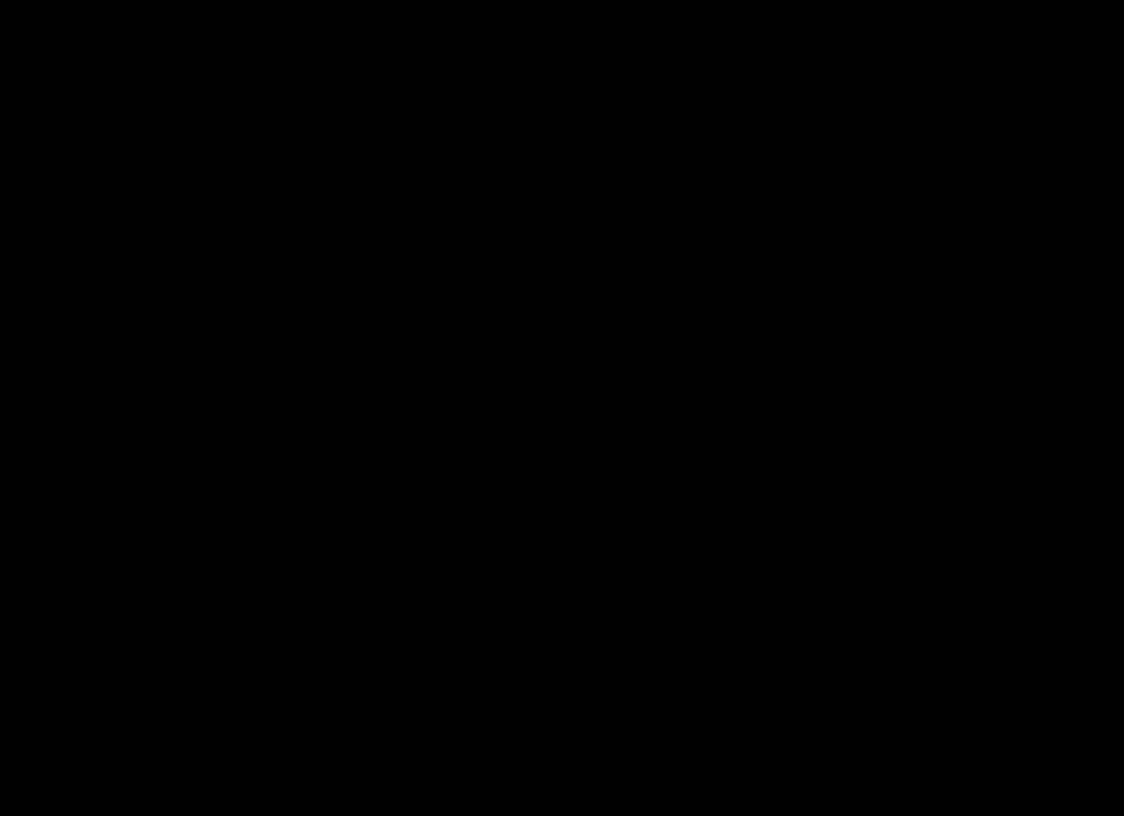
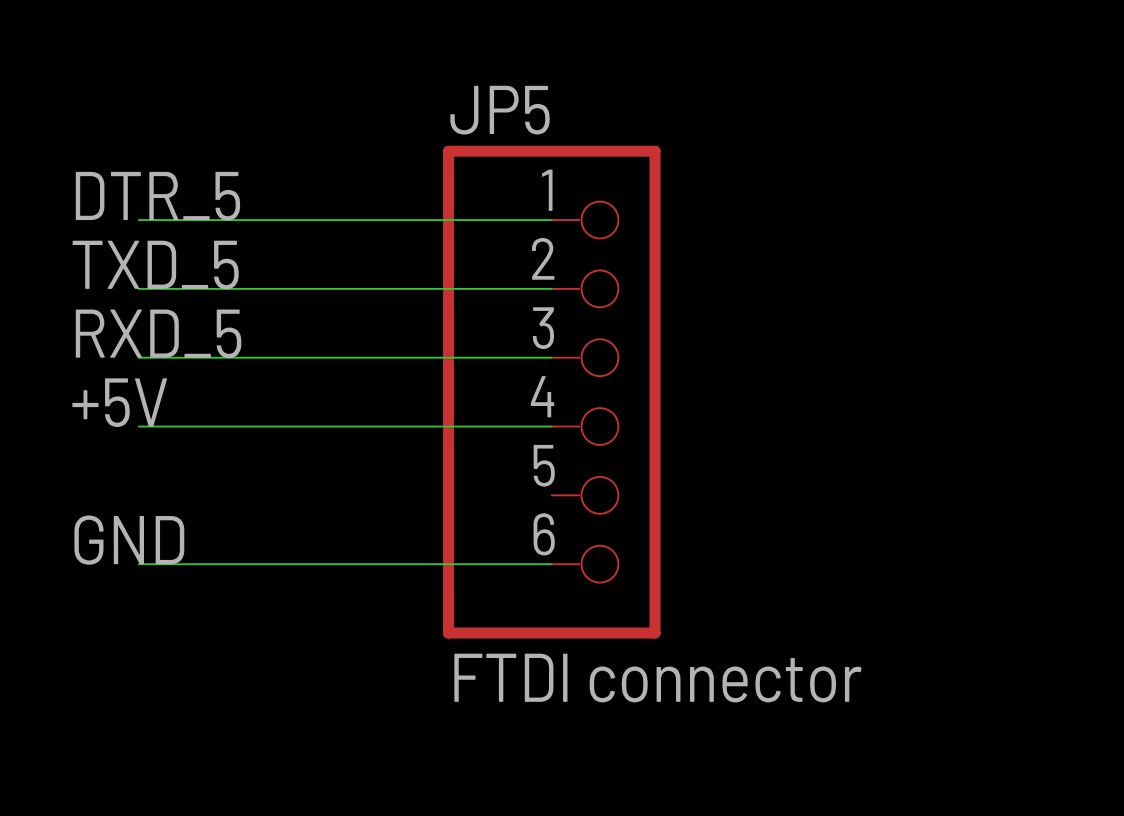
label: none -> DTR_5 (157, 196)
wire: none -> (138, 220) (551, 220)
label: none -> TXD_5 (155, 265)
wire: none -> (138, 288) (551, 288)
label: none -> RXD_5 (158, 333)
wire: none -> (138, 357) (551, 357)
JP5: none -> FTDI connector (551, 392)
label: none -> +5V (119, 402)
wire: none -> (138, 426) (551, 426)
label: none -> GND (129, 540)
wire: none -> (138, 564) (551, 564)

